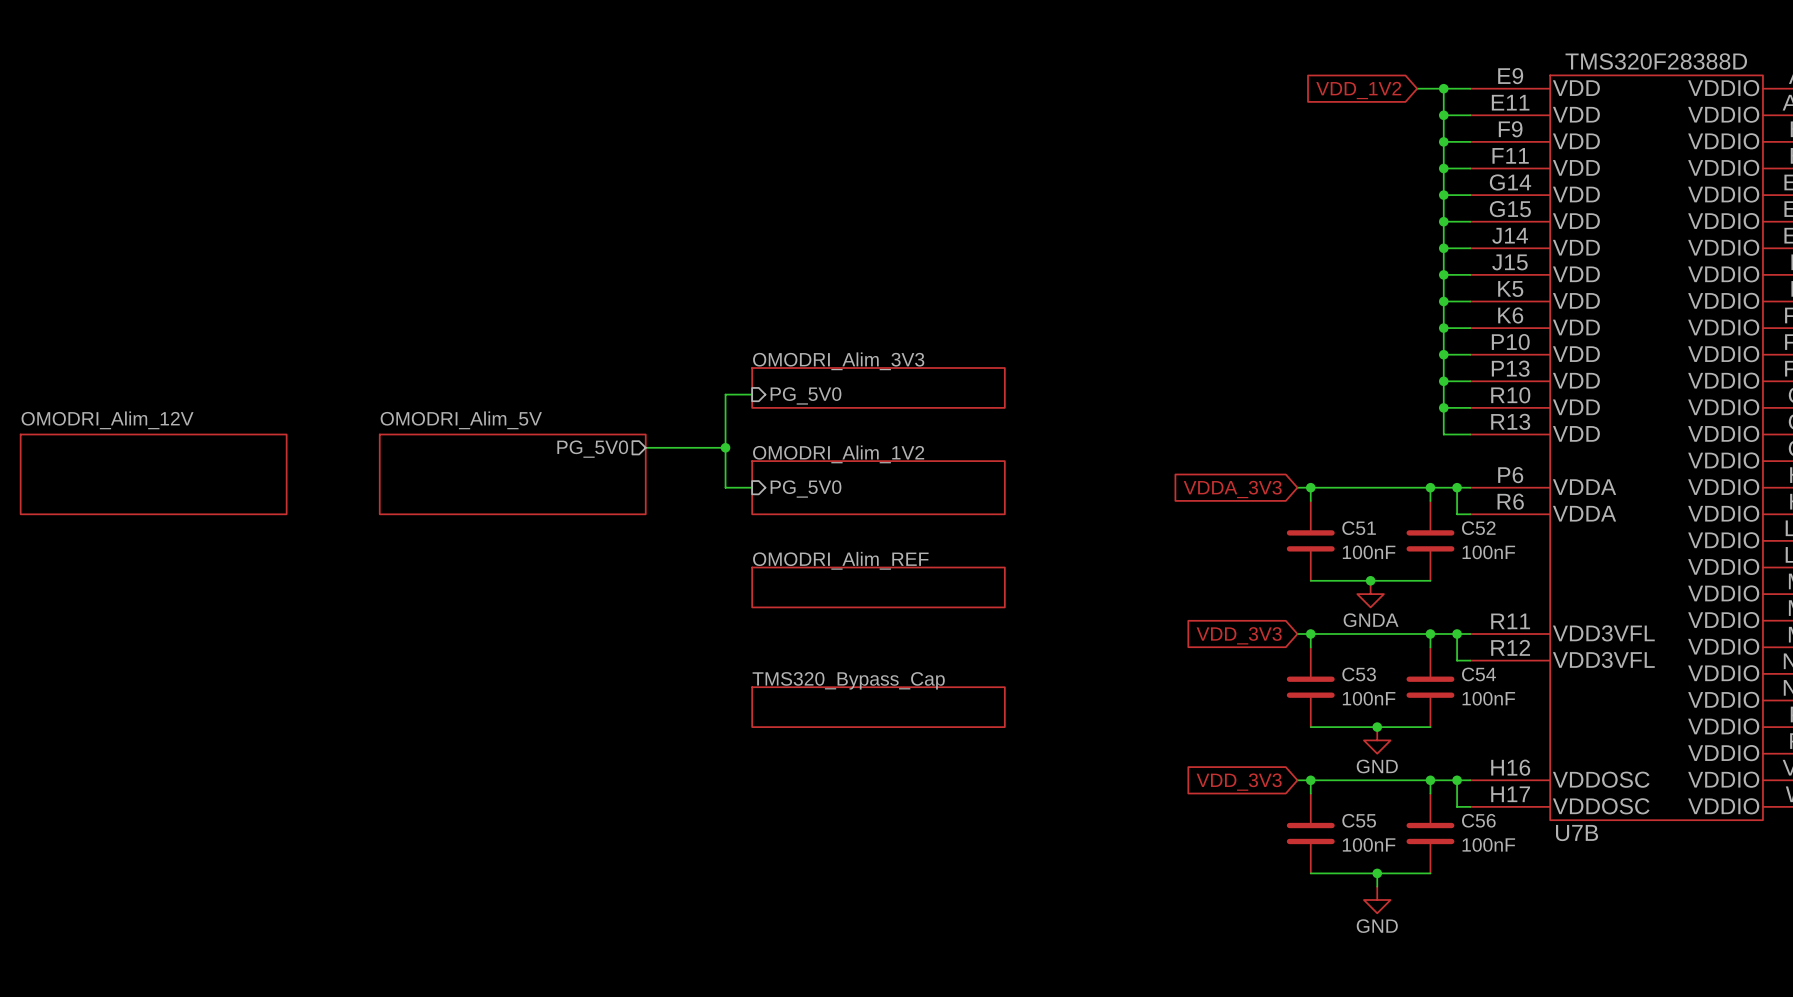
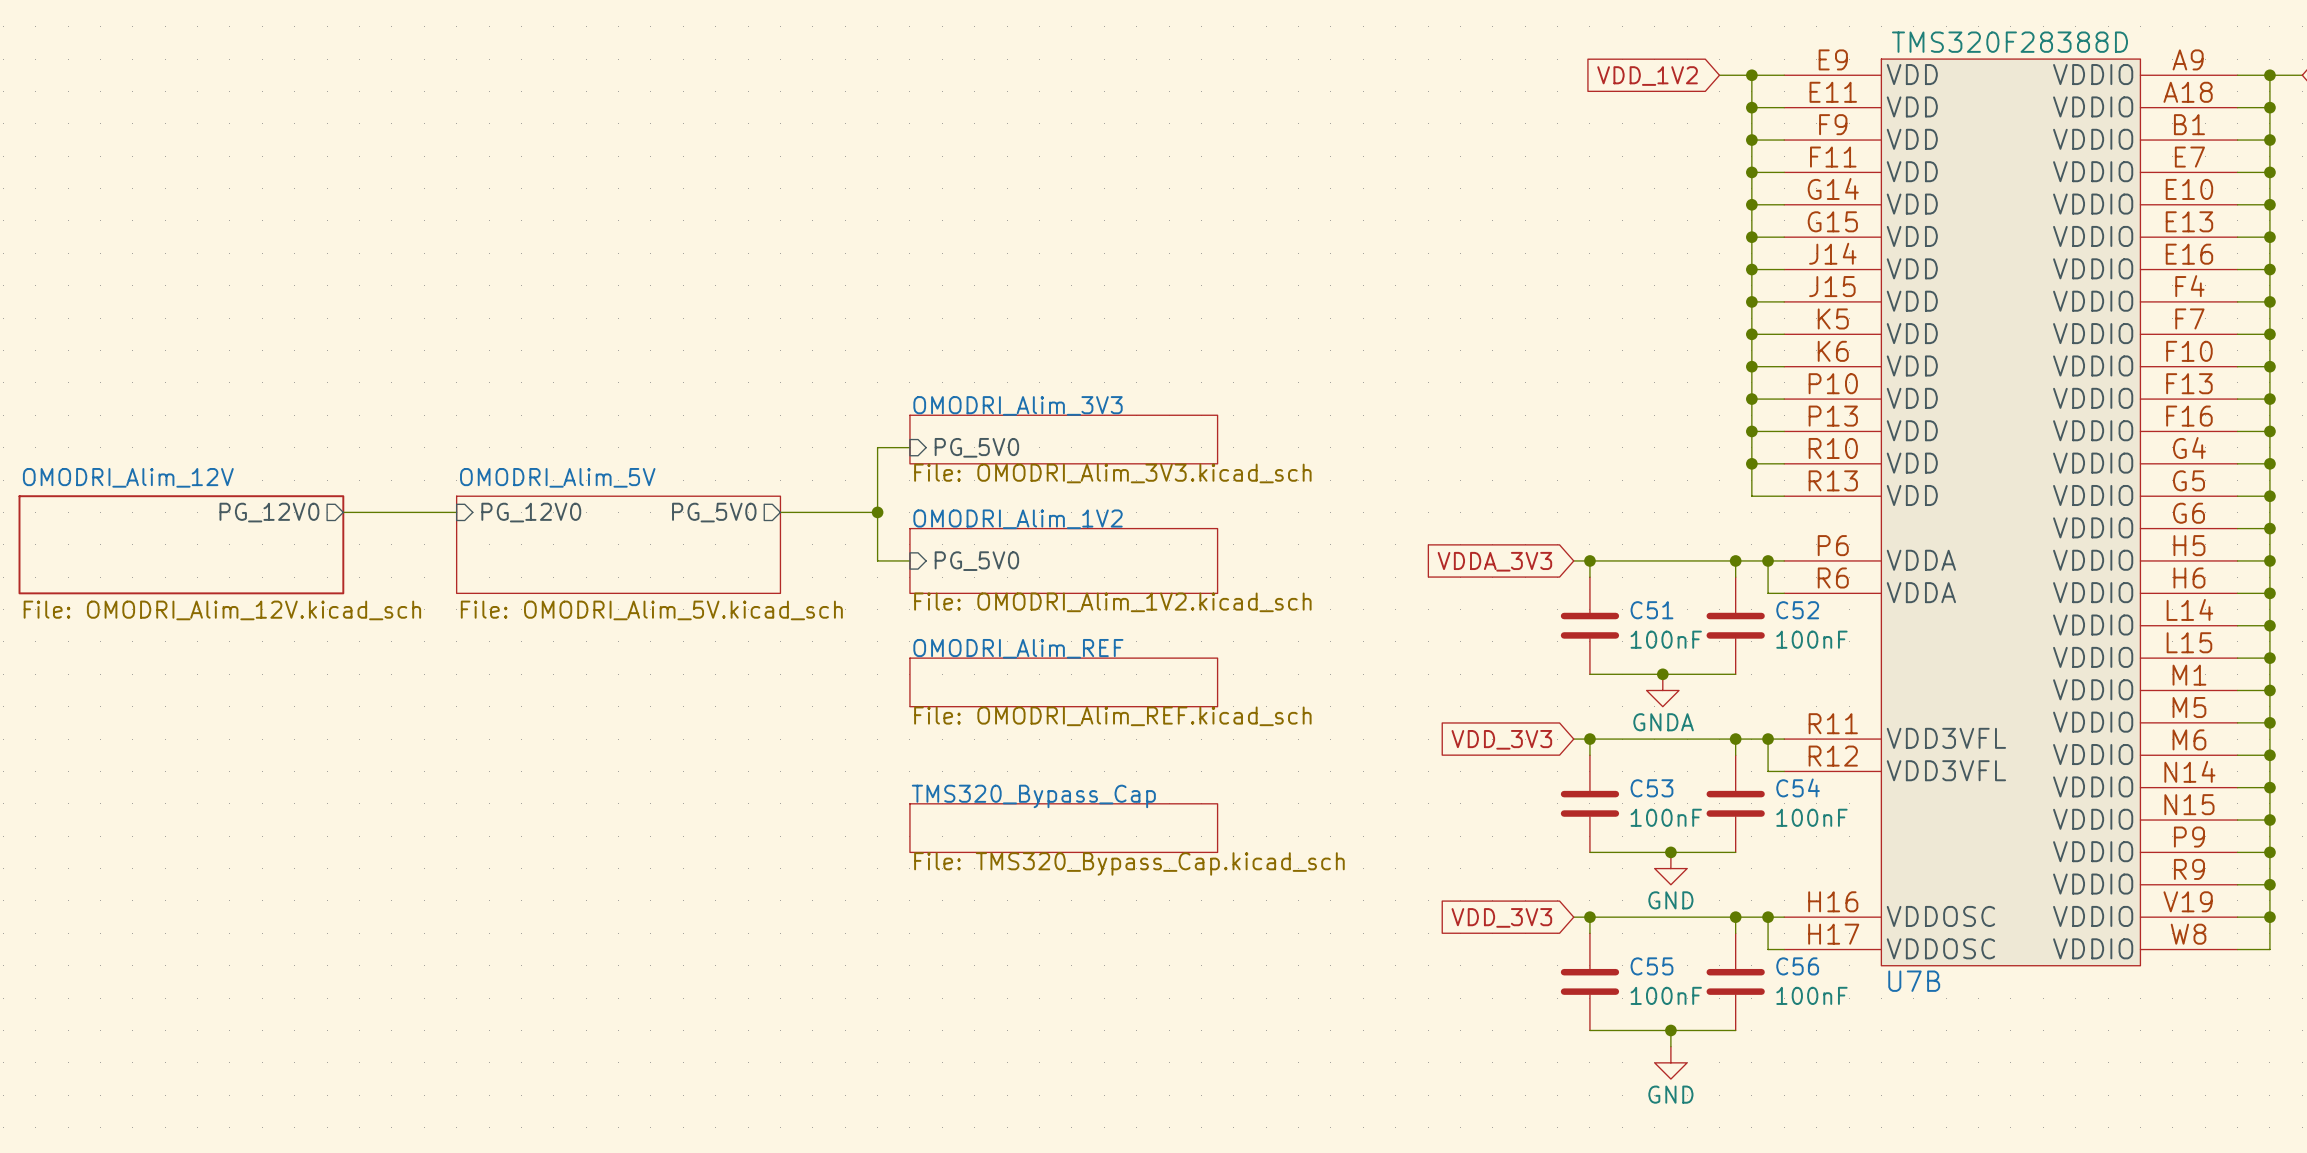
sheet OMODRI_Alim_3V3 value: none -> File: OMODRI_Alim_3V3.kicad_sch (1112, 473)
wire: none -> (343, 512) (456, 512)
sheet pin: none -> PG_12V0 (269, 512)
sheet pin: none -> PG_12V0 (531, 512)
sheet OMODRI_Alim_1V2 value: none -> File: OMODRI_Alim_1V2.kicad_sch (1112, 602)
sheet OMODRI_Alim_12V value: none -> File: OMODRI_Alim_12V.kicad_sch (222, 610)
sheet OMODRI_Alim_5V value: none -> File: OMODRI_Alim_5V.kicad_sch (651, 610)
sheet OMODRI_Alim_REF value: none -> File: OMODRI_Alim_REF.kicad_sch (1112, 716)
sheet TMS320_Bypass_Cap value: none -> File: TMS320_Bypass_Cap.kicad_sch (1129, 863)

